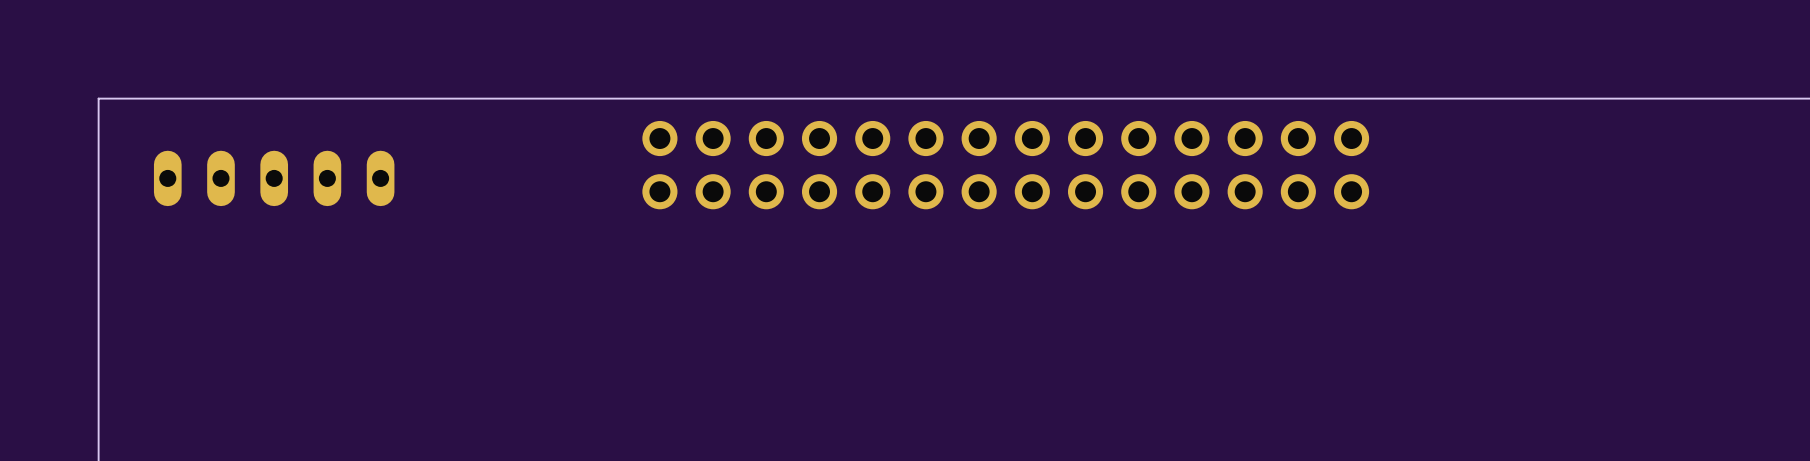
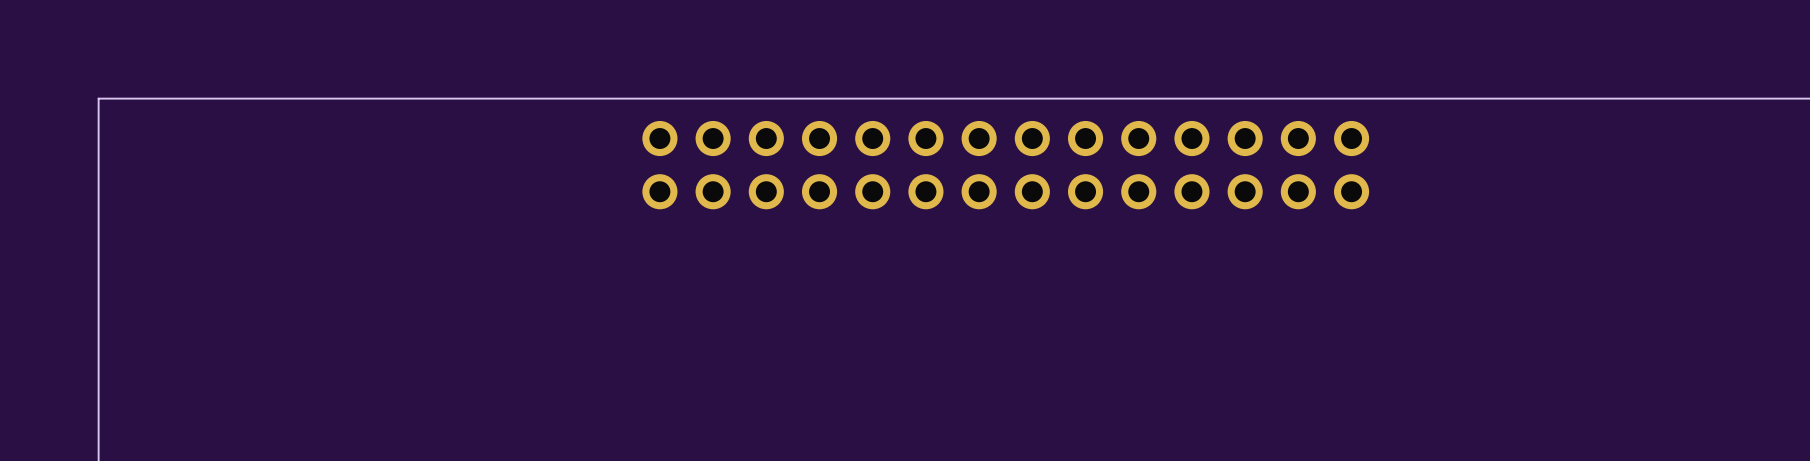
part: (274, 178) -> none

